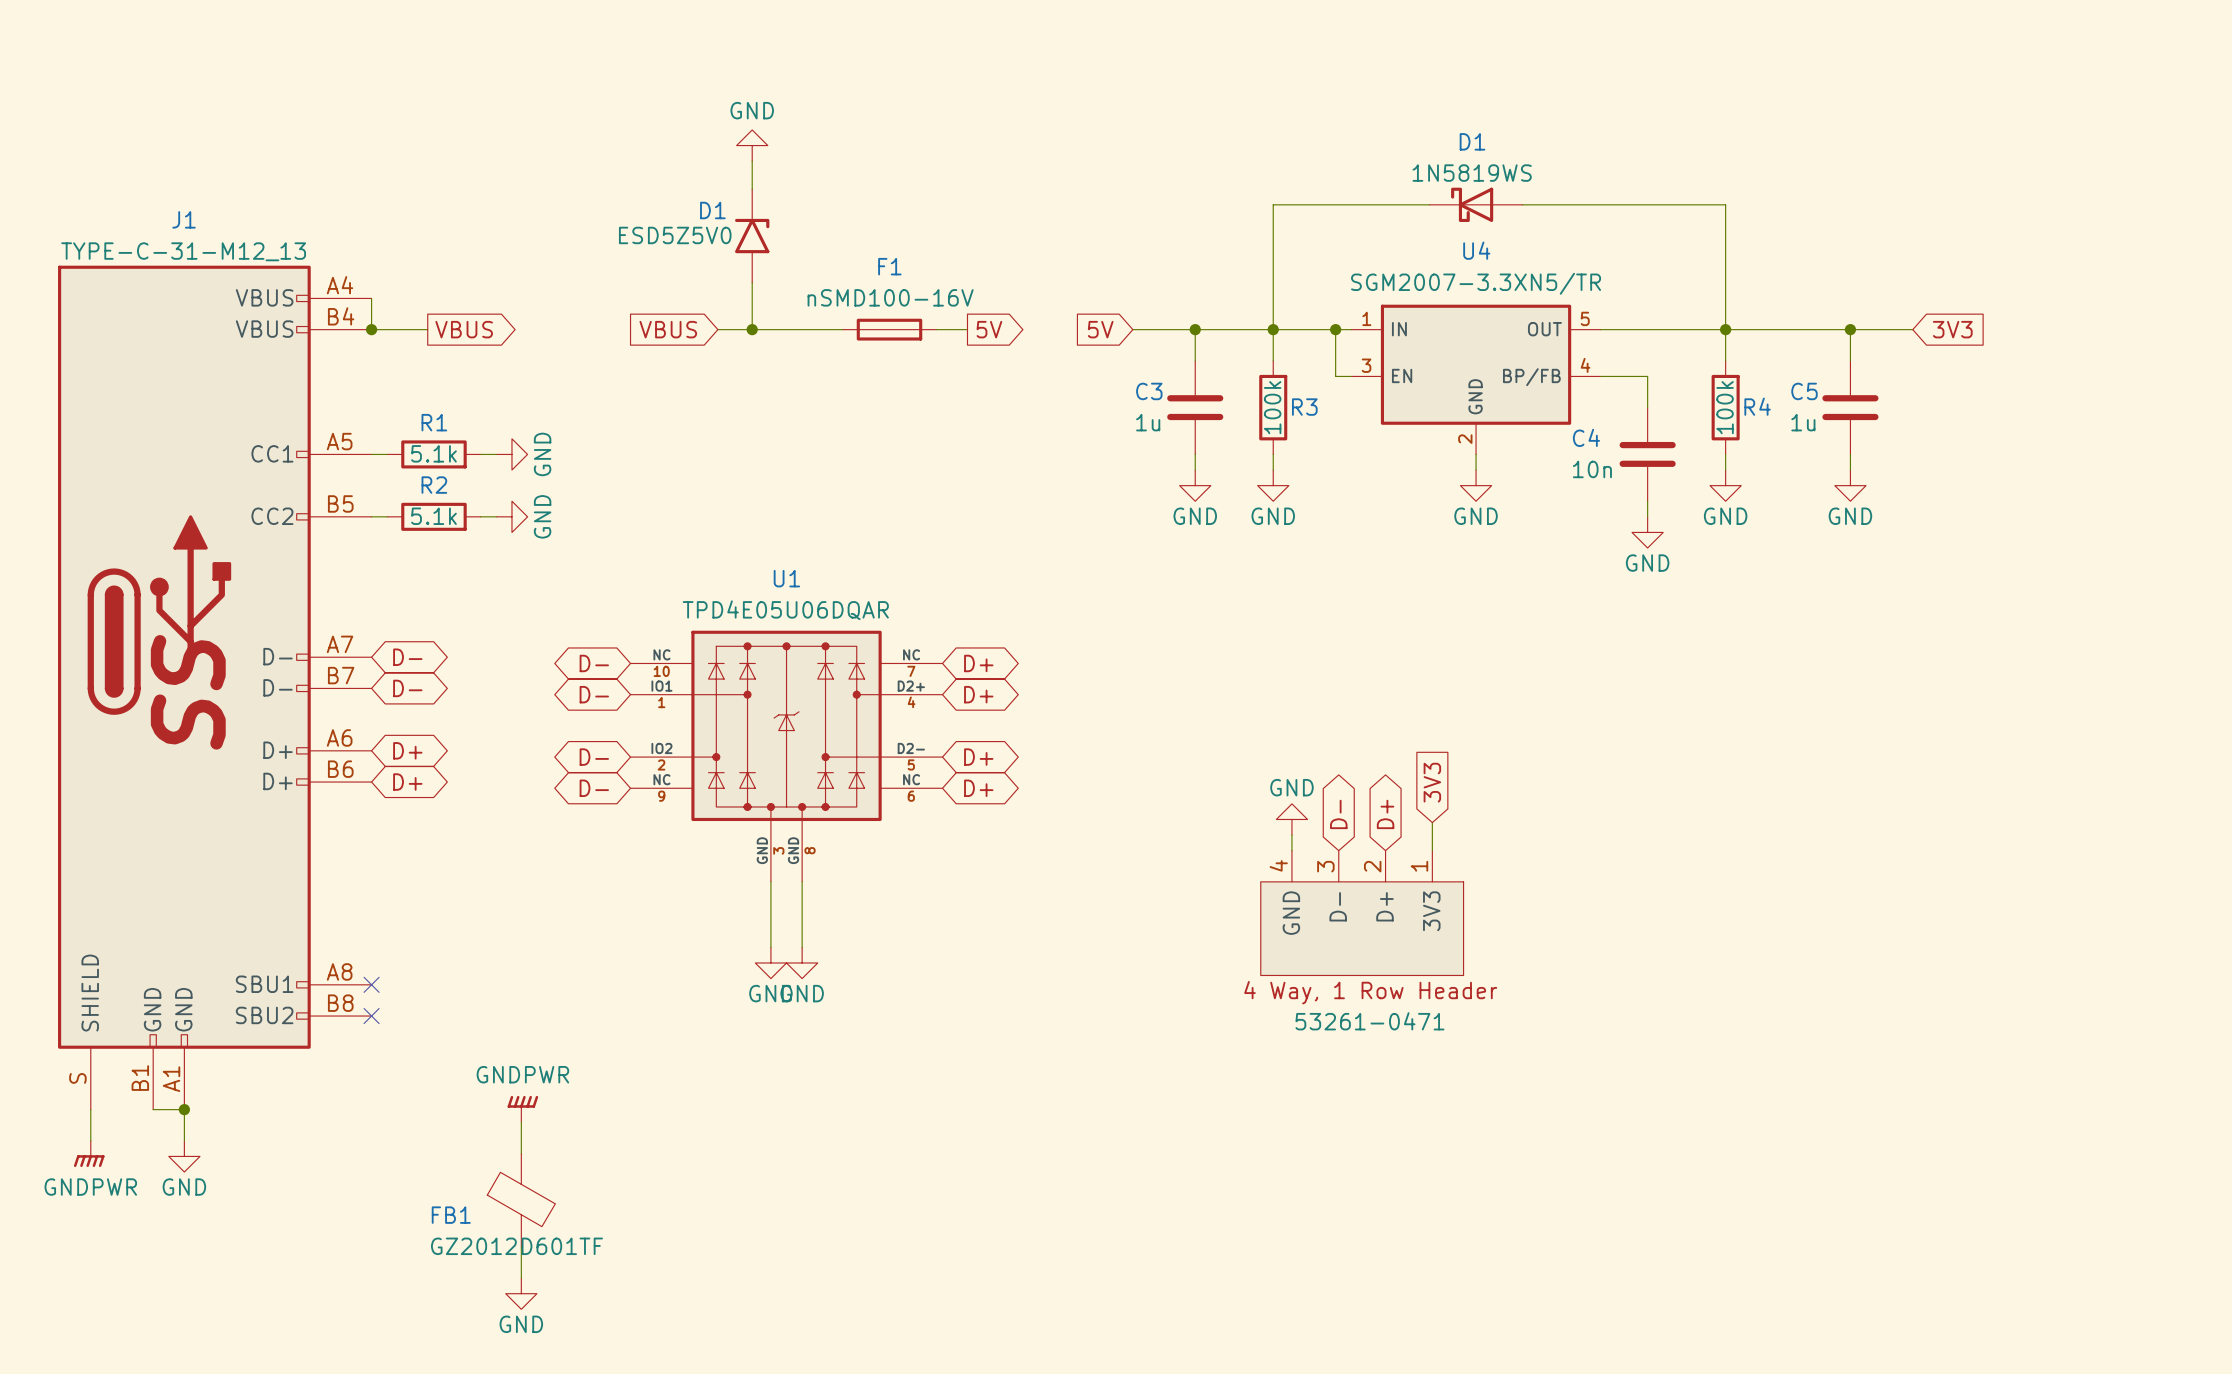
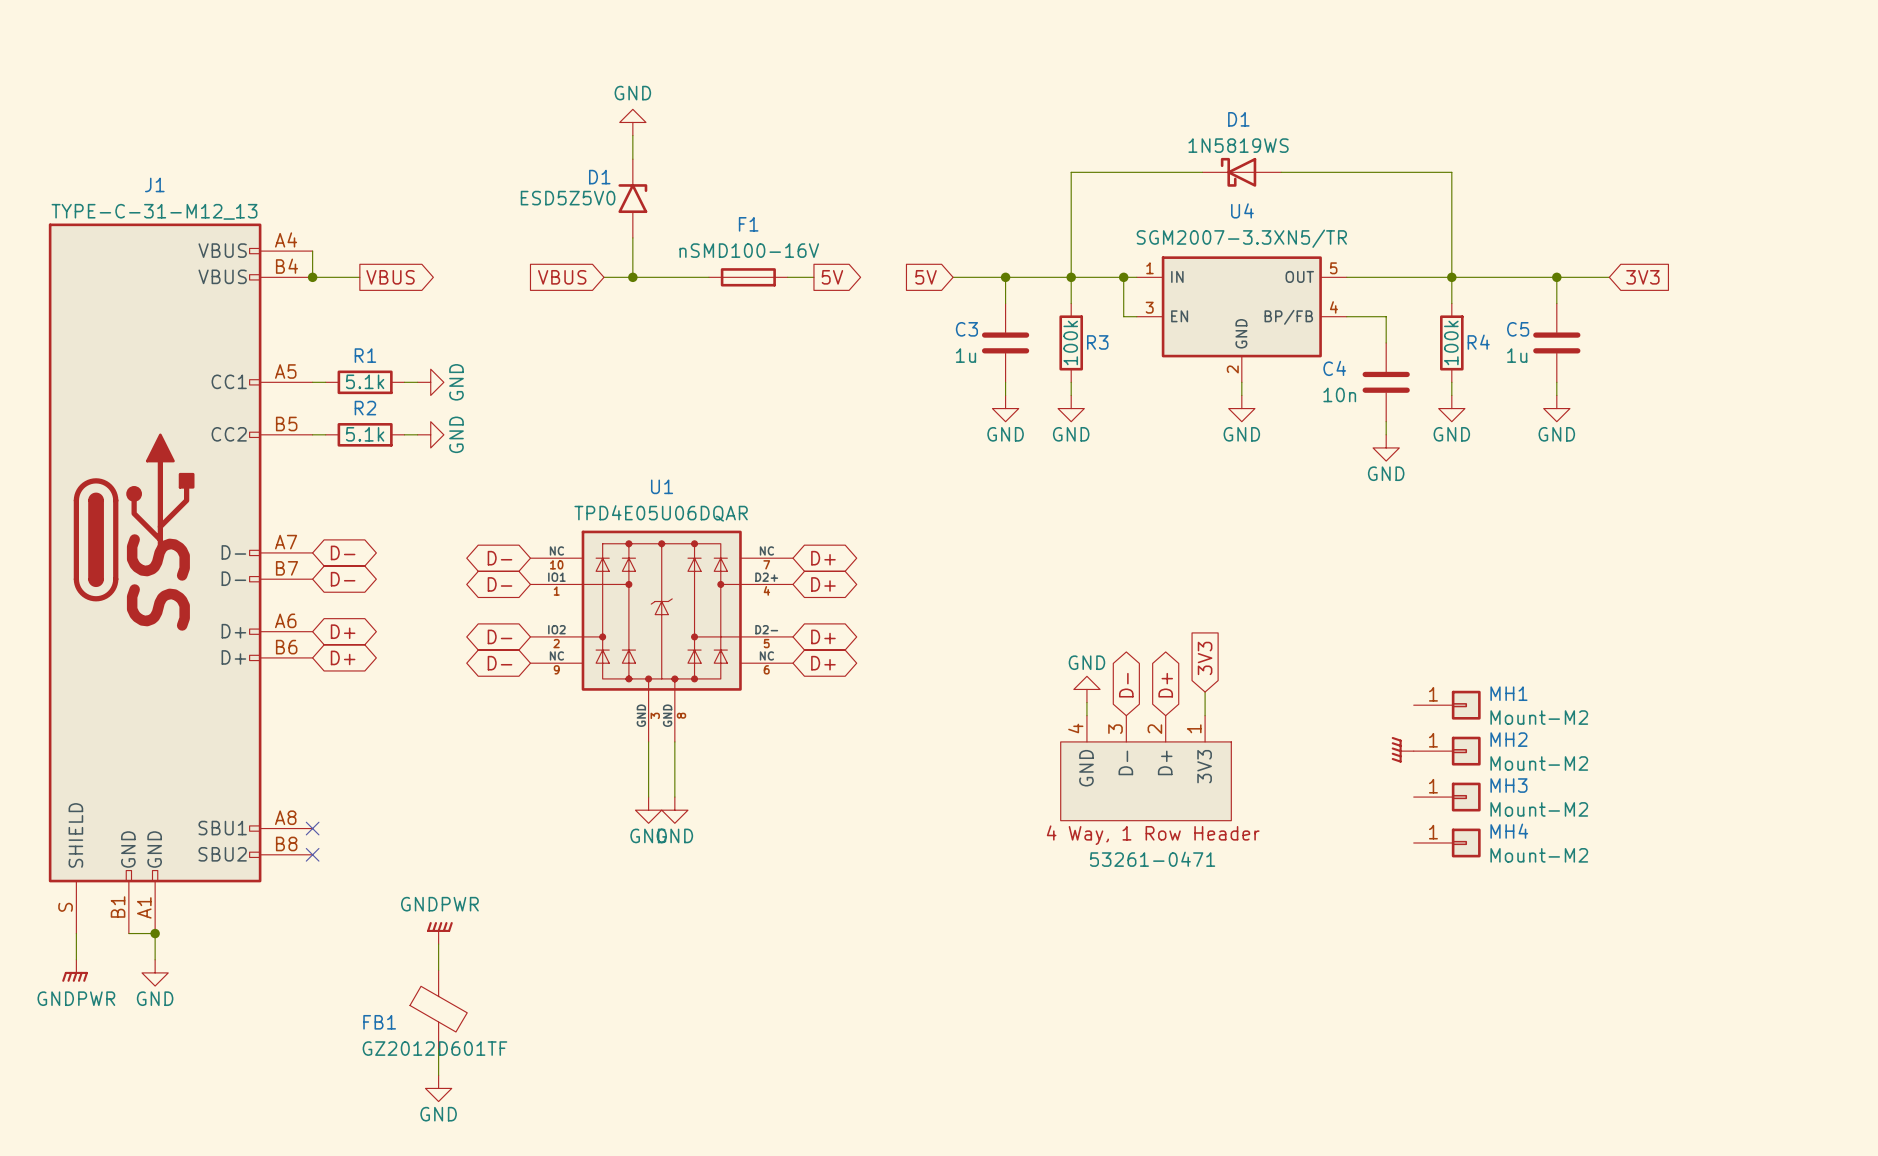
MH1: none -> Mount-M2 (1447, 705)
power symbol: none -> (1402, 749)
MH2: none -> Mount-M2 (1447, 751)
MH3: none -> Mount-M2 (1447, 797)
MH4: none -> Mount-M2 (1447, 842)

